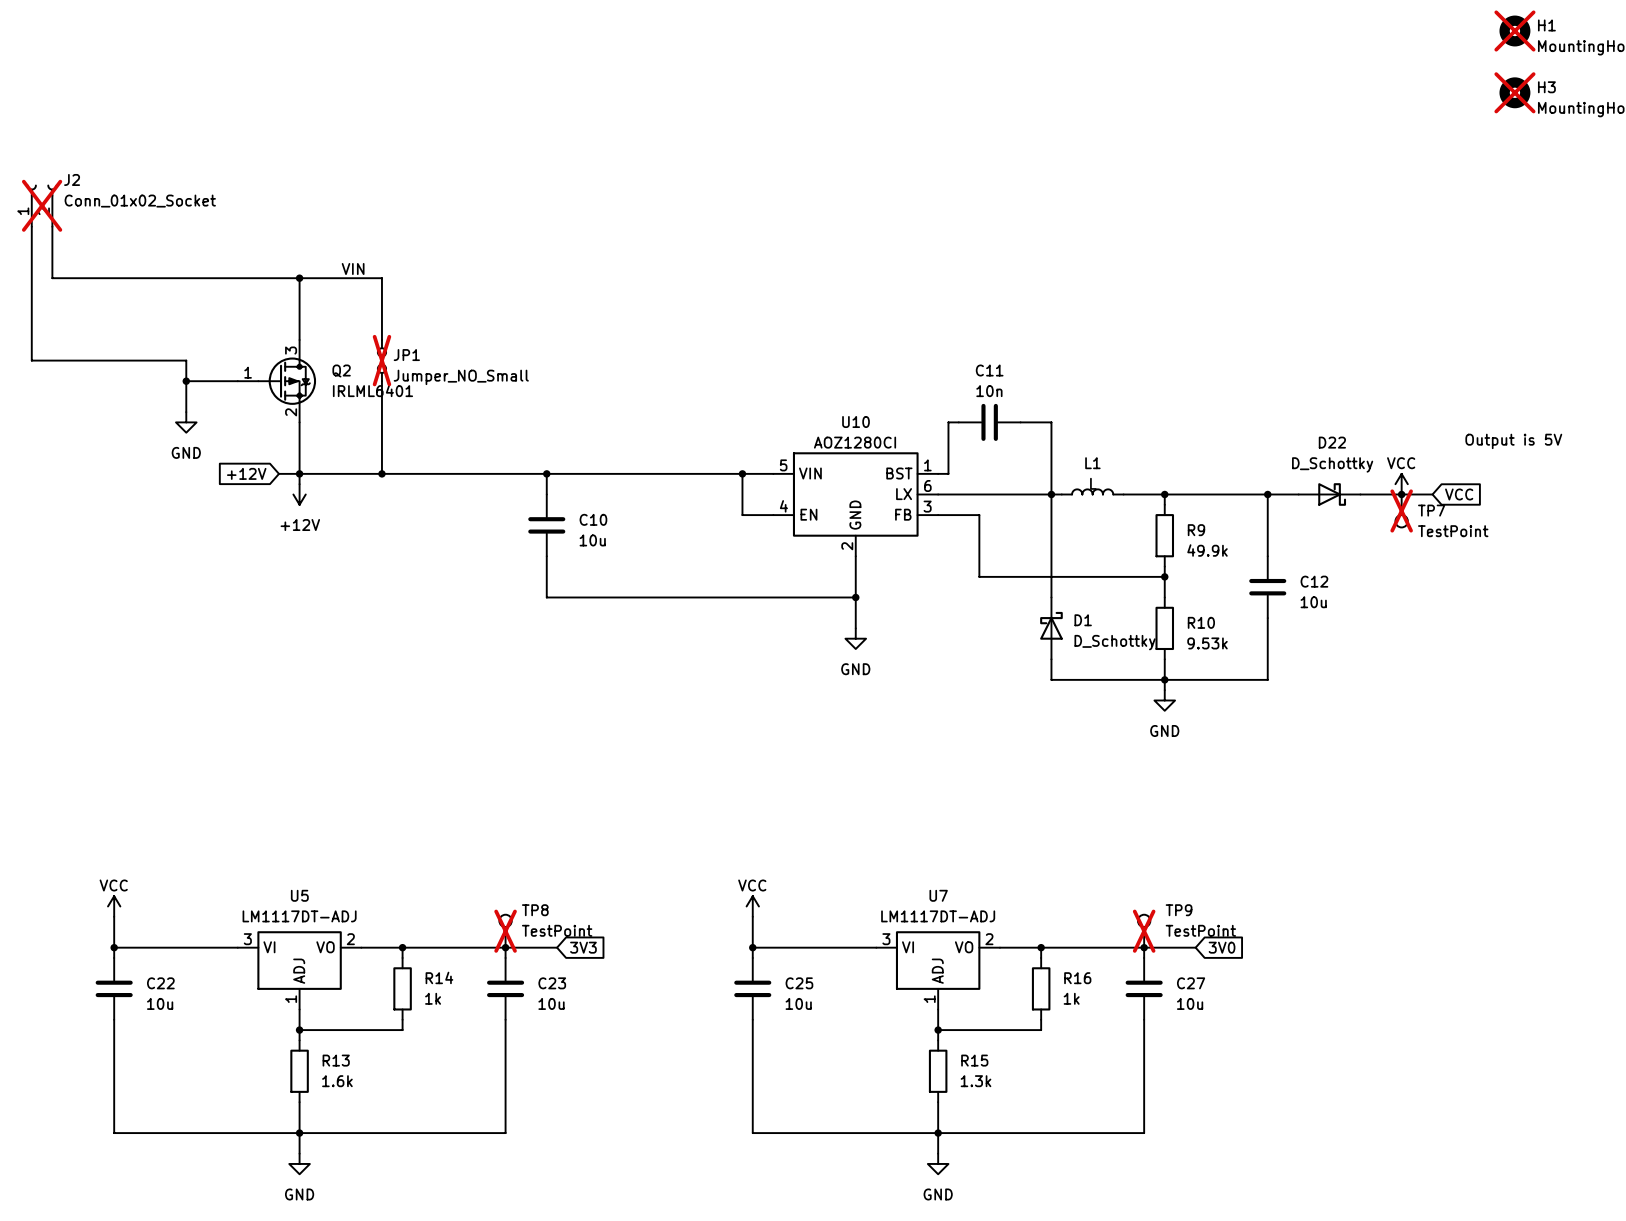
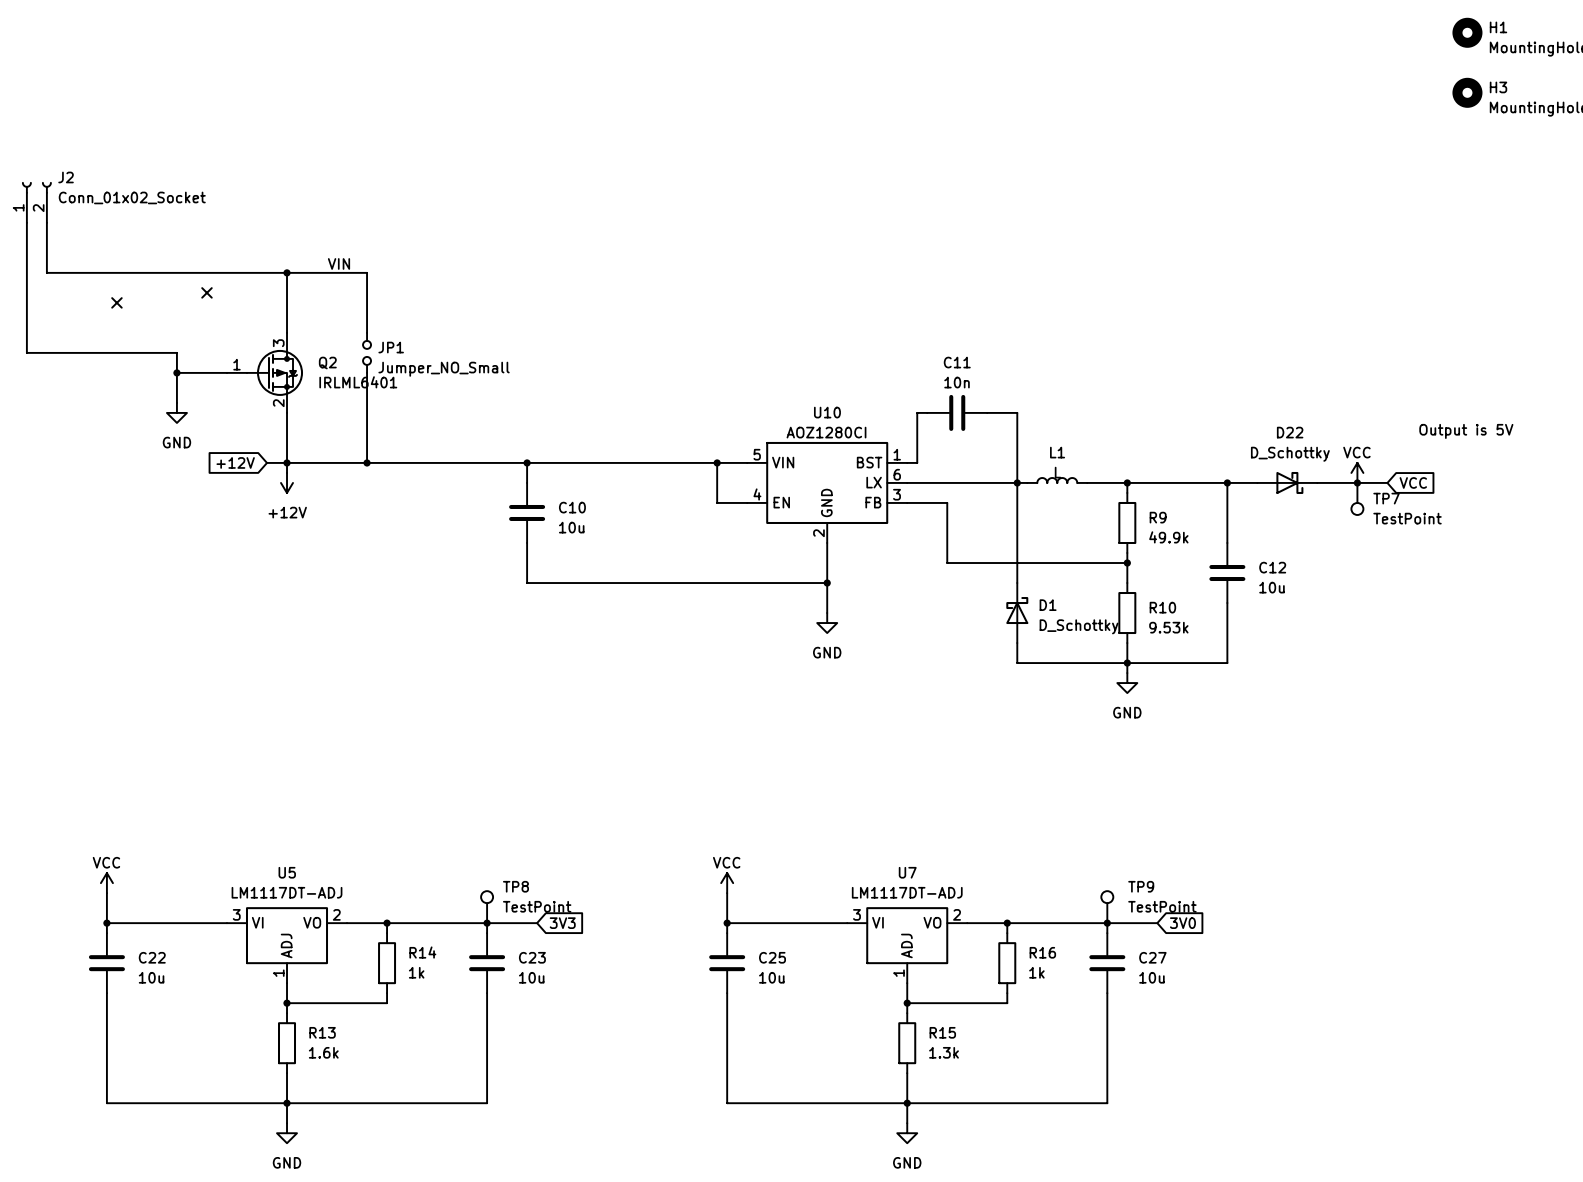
H1 do-not-place cross: (1514, 31) -> none
H3 do-not-place cross: (1514, 92) -> none
J2 do-not-place cross: (42, 205) -> none
no-connect mark: none -> (206, 292)
no-connect mark: none -> (116, 302)
JP1 do-not-place cross: (381, 360) -> none
TP7 do-not-place cross: (1401, 510) -> none
TP8 do-not-place cross: (505, 931) -> none
TP9 do-not-place cross: (1144, 931) -> none

